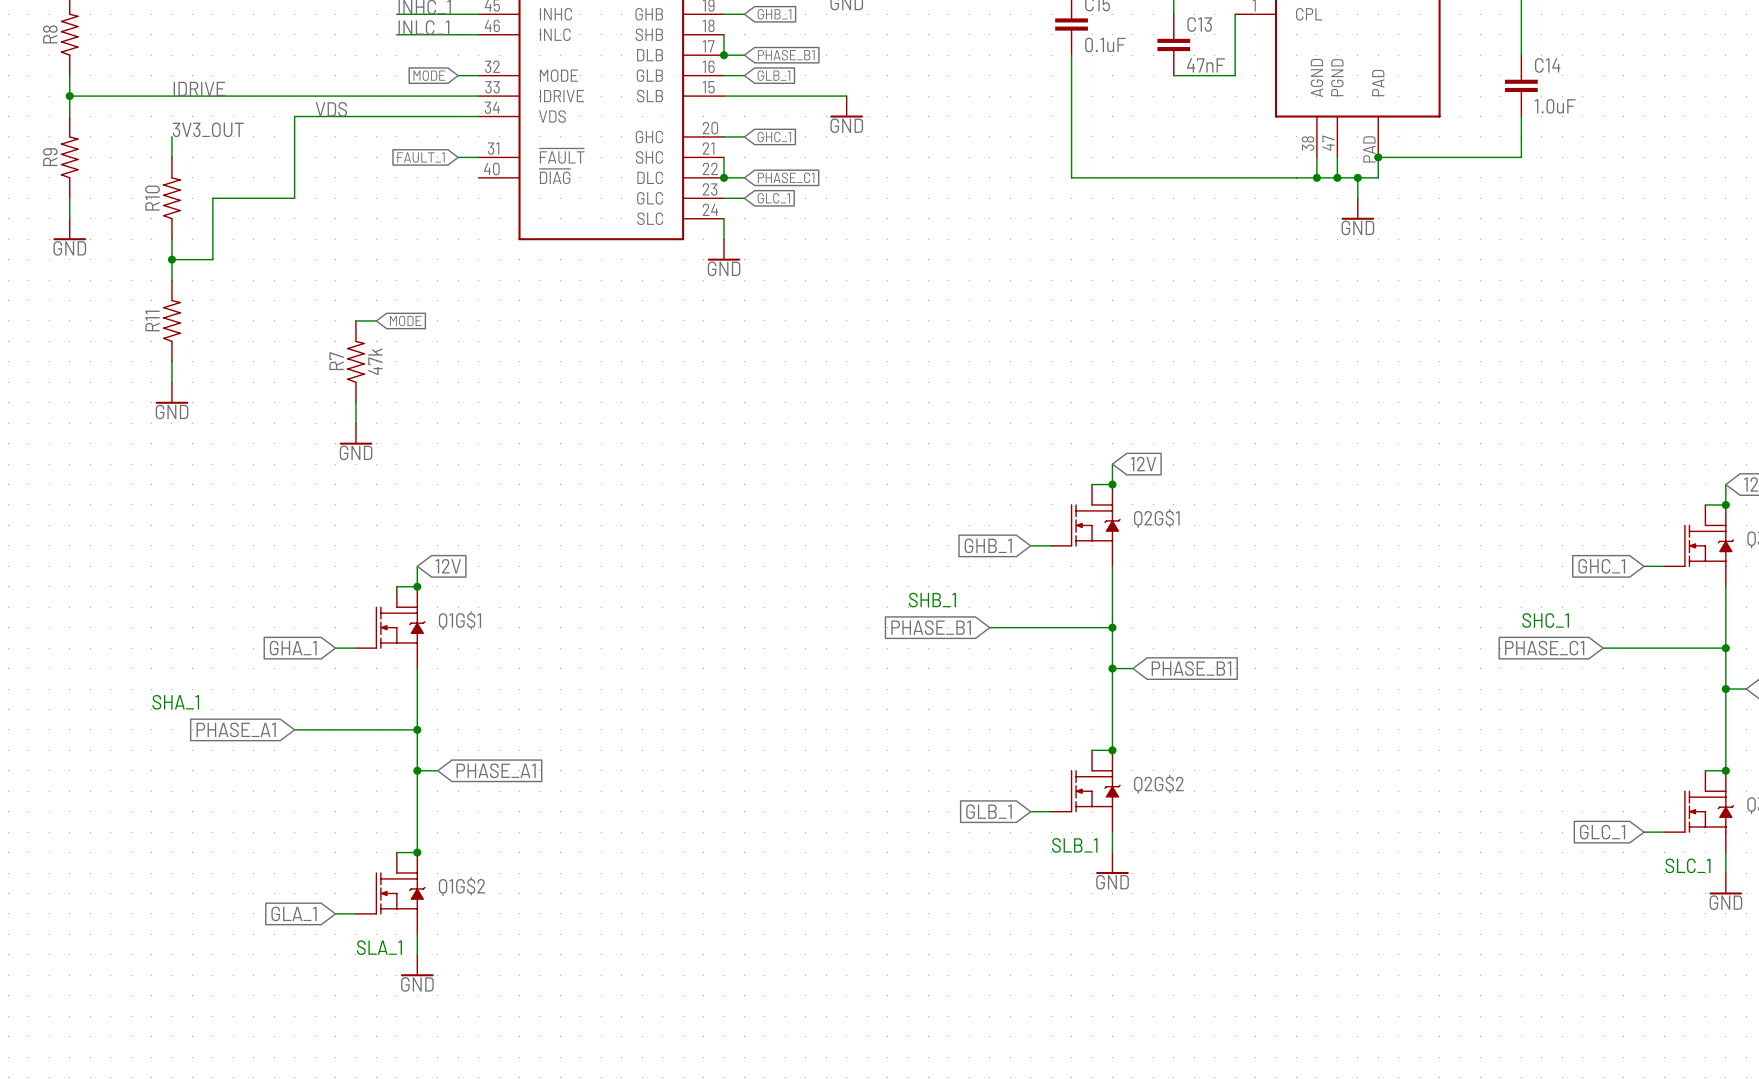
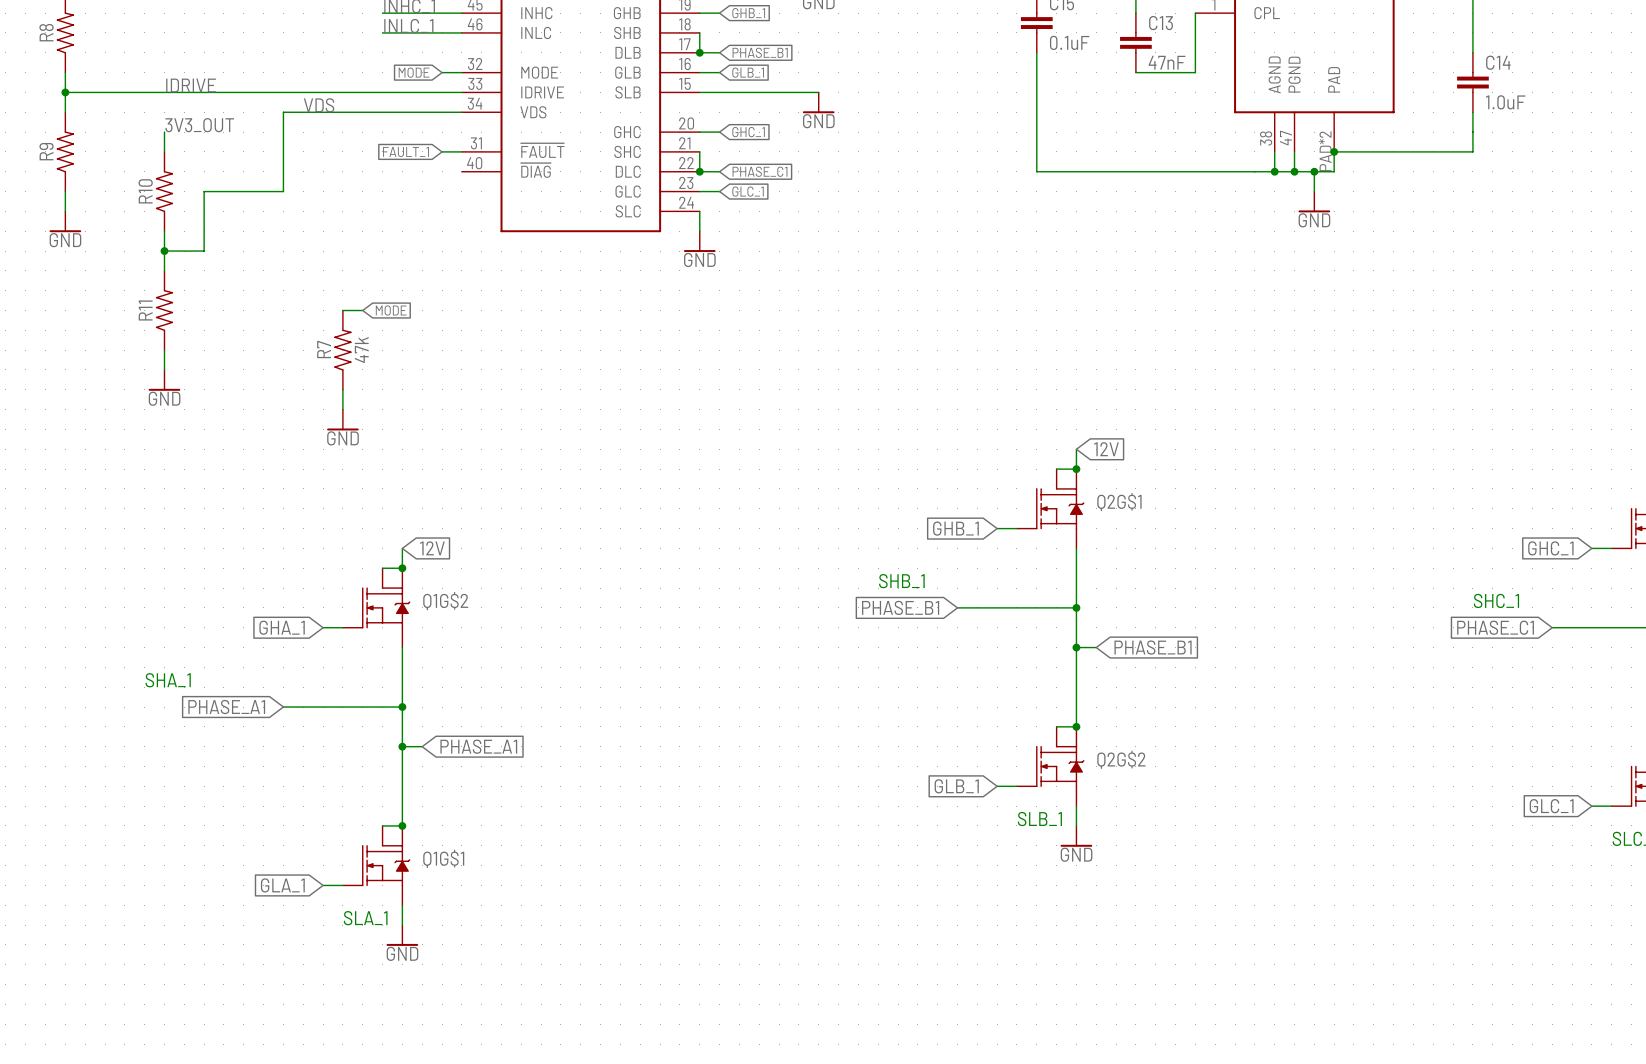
part pin number: PAD (1369, 149) -> PAD*2 (1325, 151)
Q1G$1 name: Q1G$1 (459, 620) -> Q1G$2 (445, 601)
Q1G$2 name: Q1G$2 (461, 886) -> Q1G$1 (443, 858)

